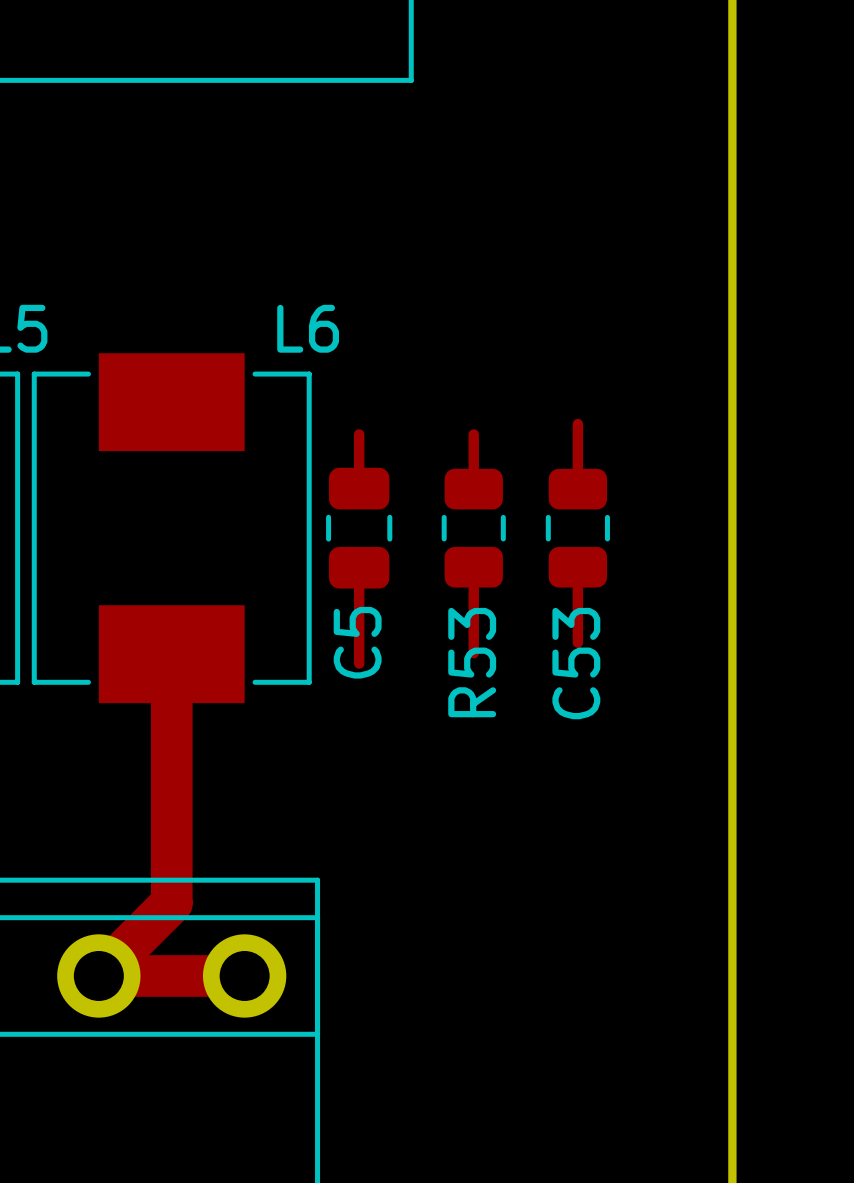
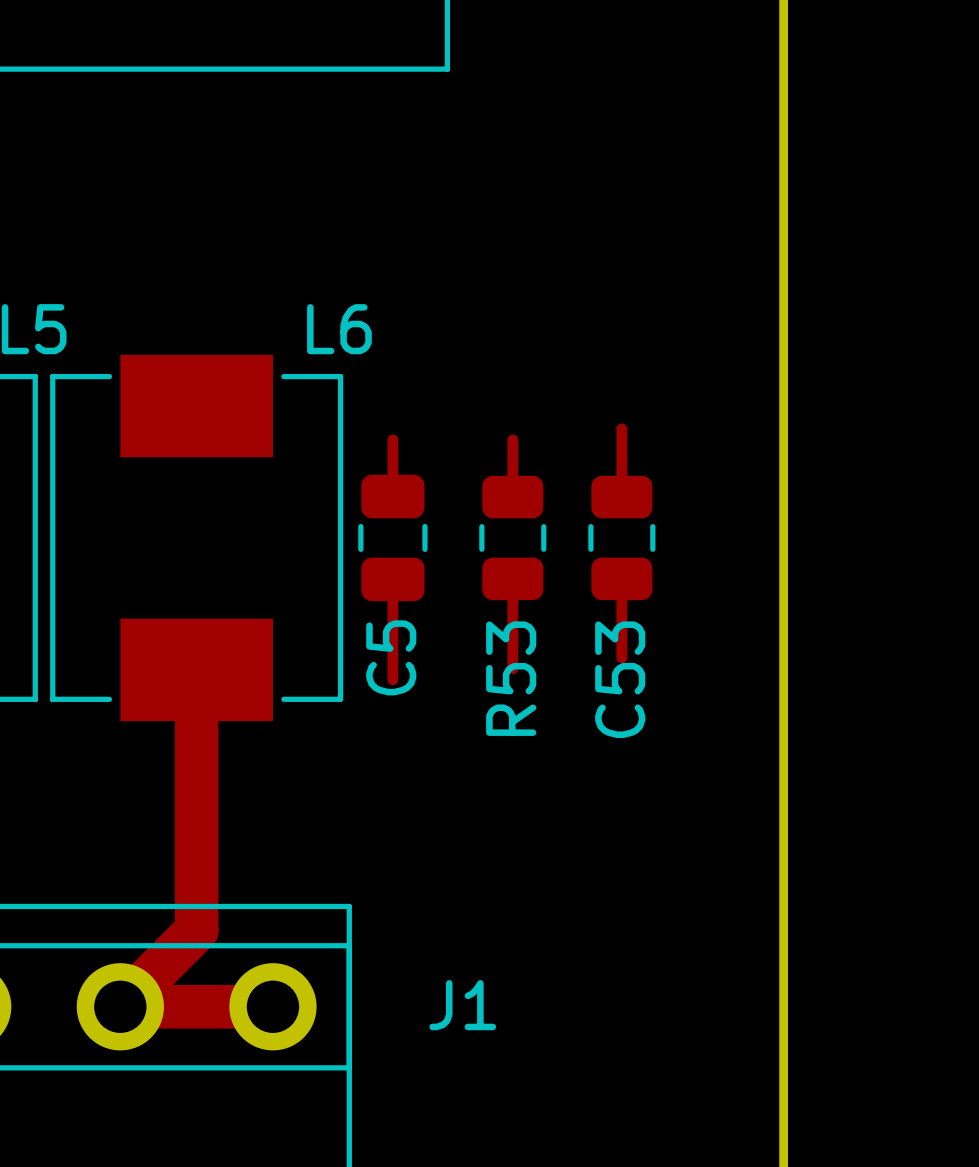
J1 name: none -> J1 (462, 1005)

